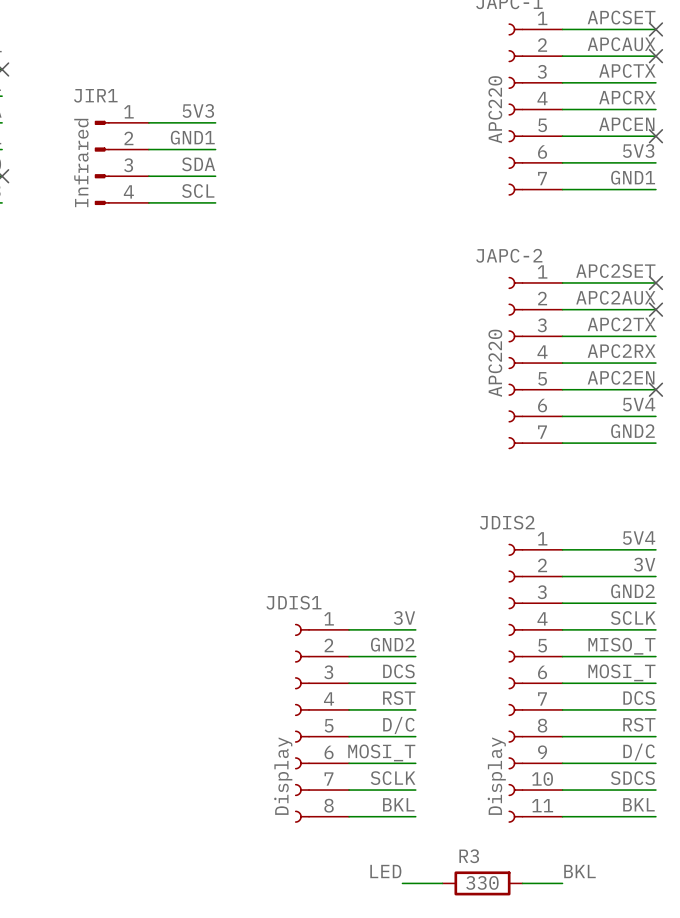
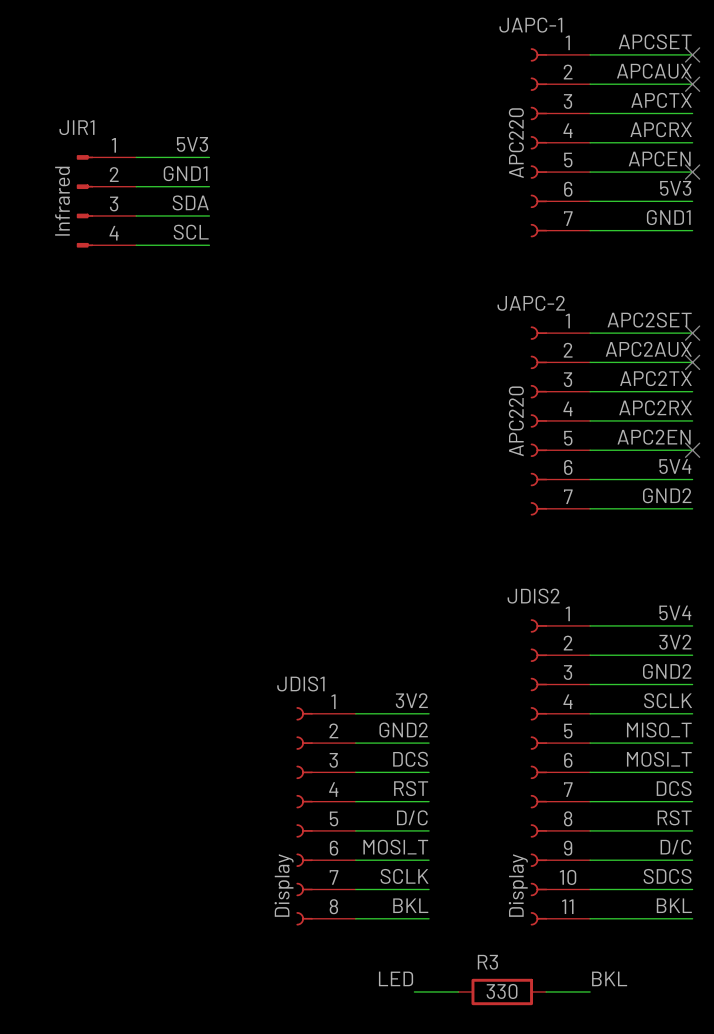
label: 3V (644, 564) -> 3V2 (675, 642)
label: 3V (404, 617) -> 3V2 (411, 700)

